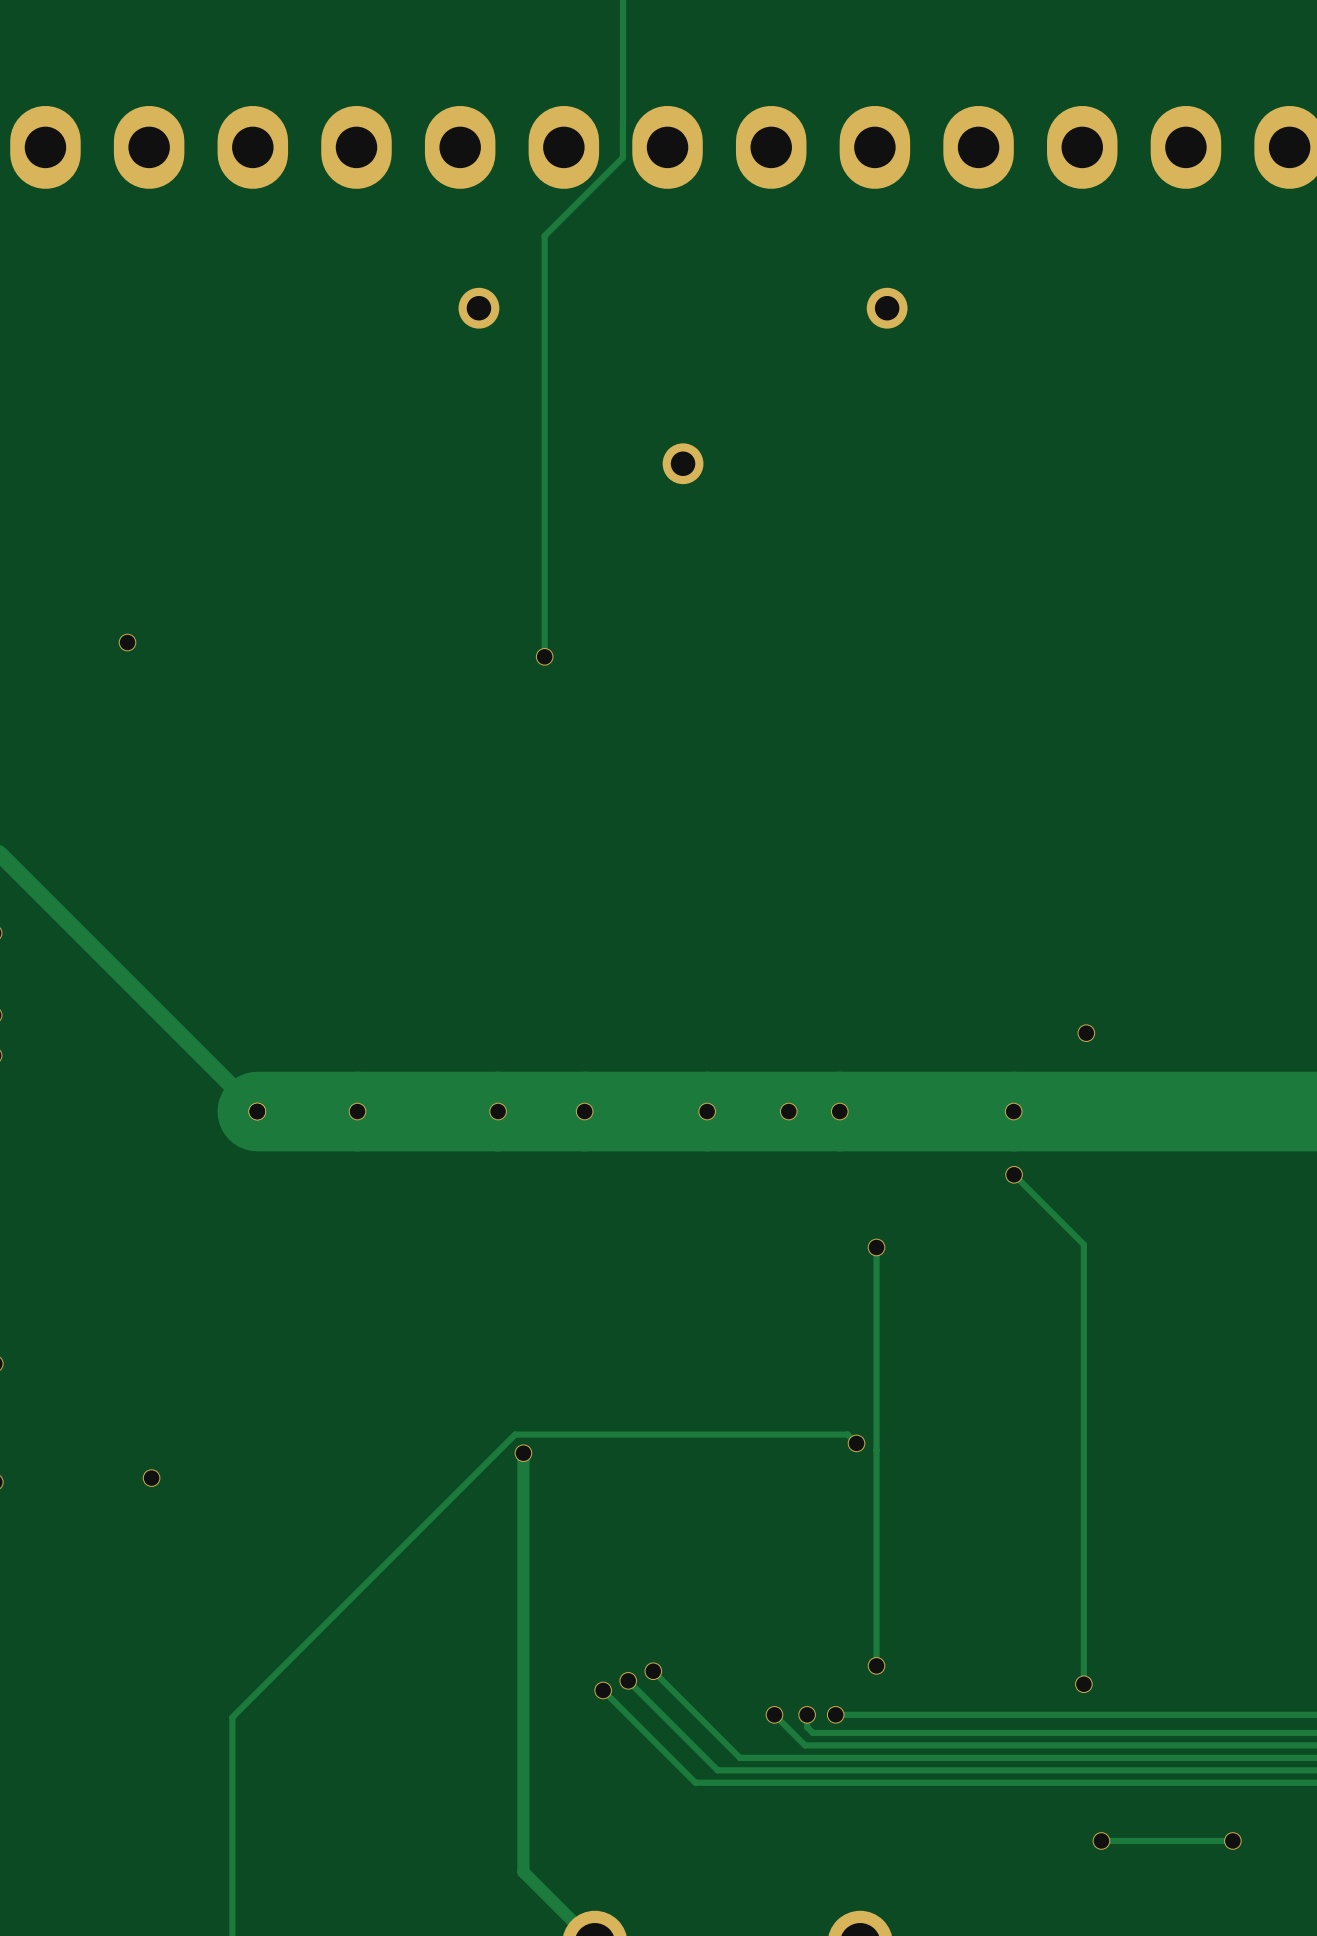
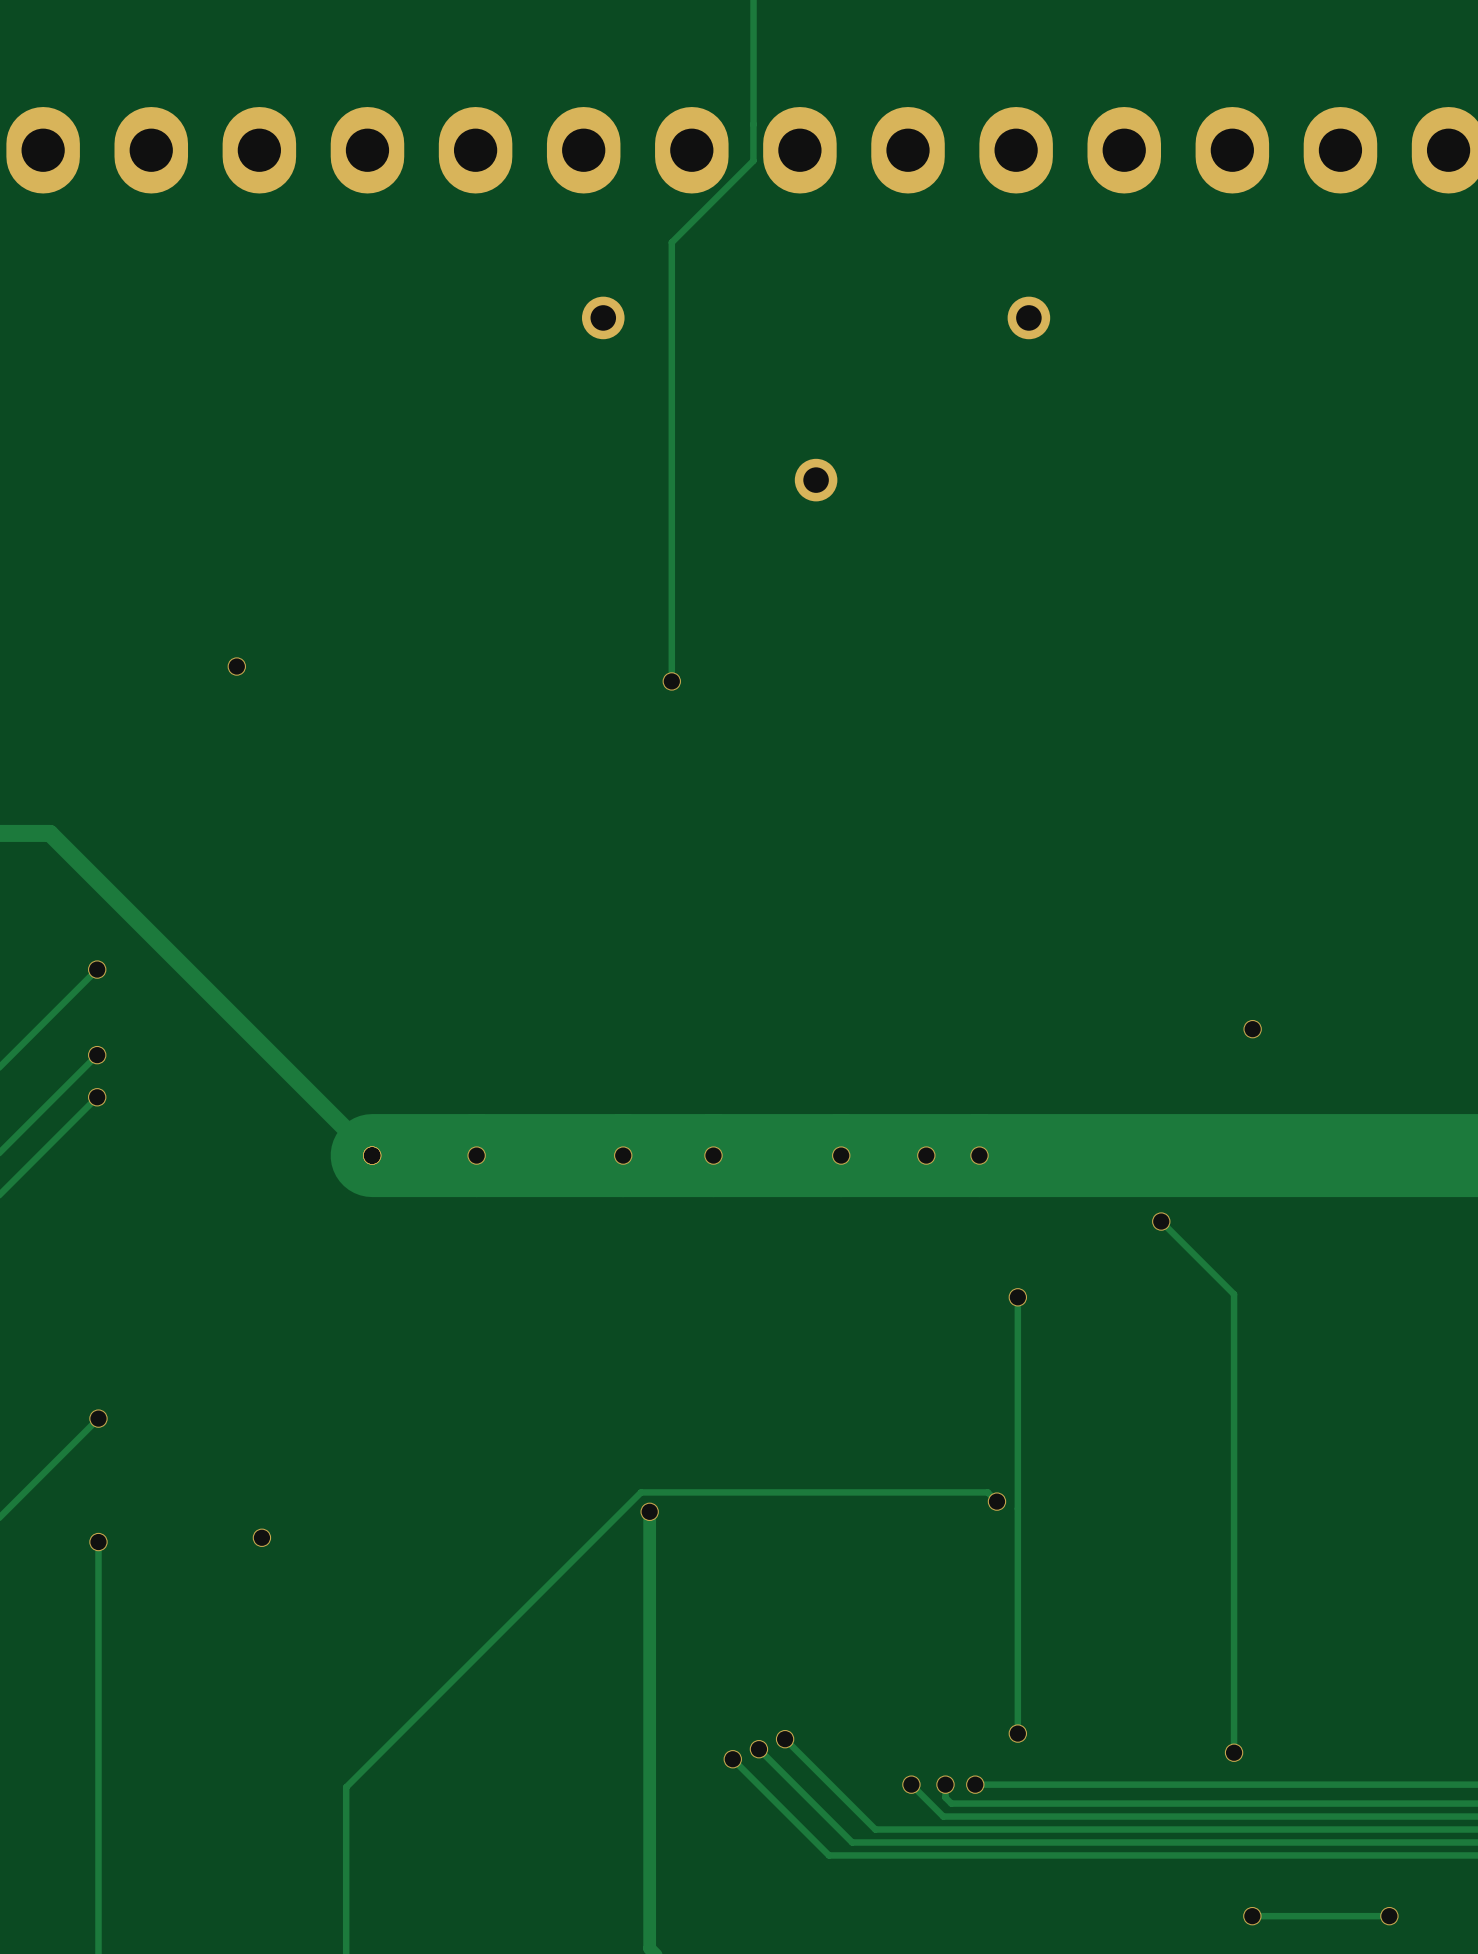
via position: (1086, 1033) -> (1252, 1029)
via: (1013, 1111) -> none

